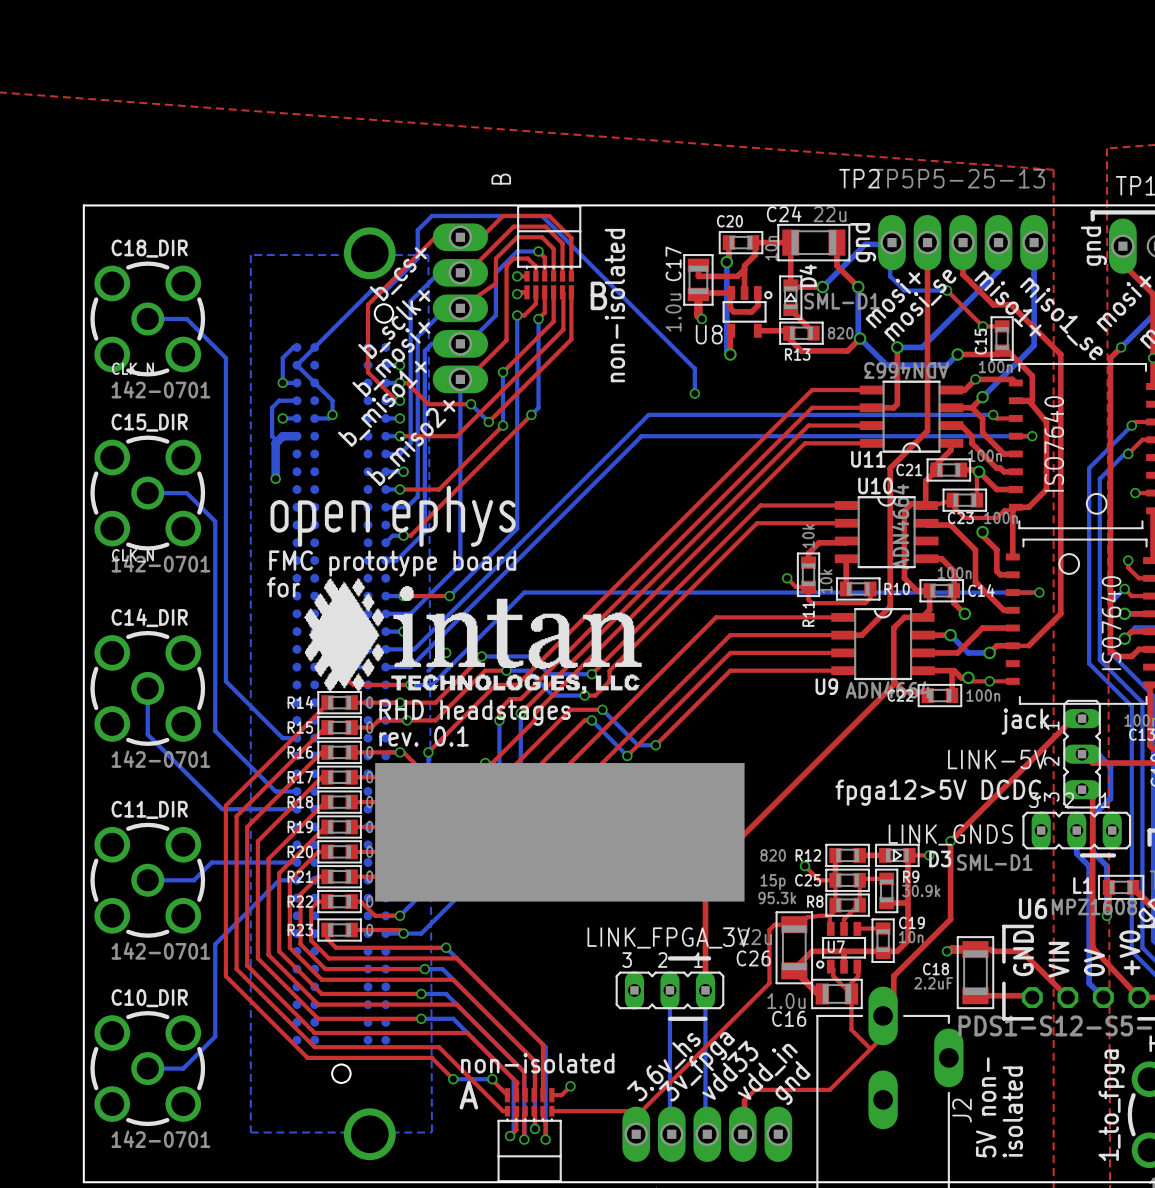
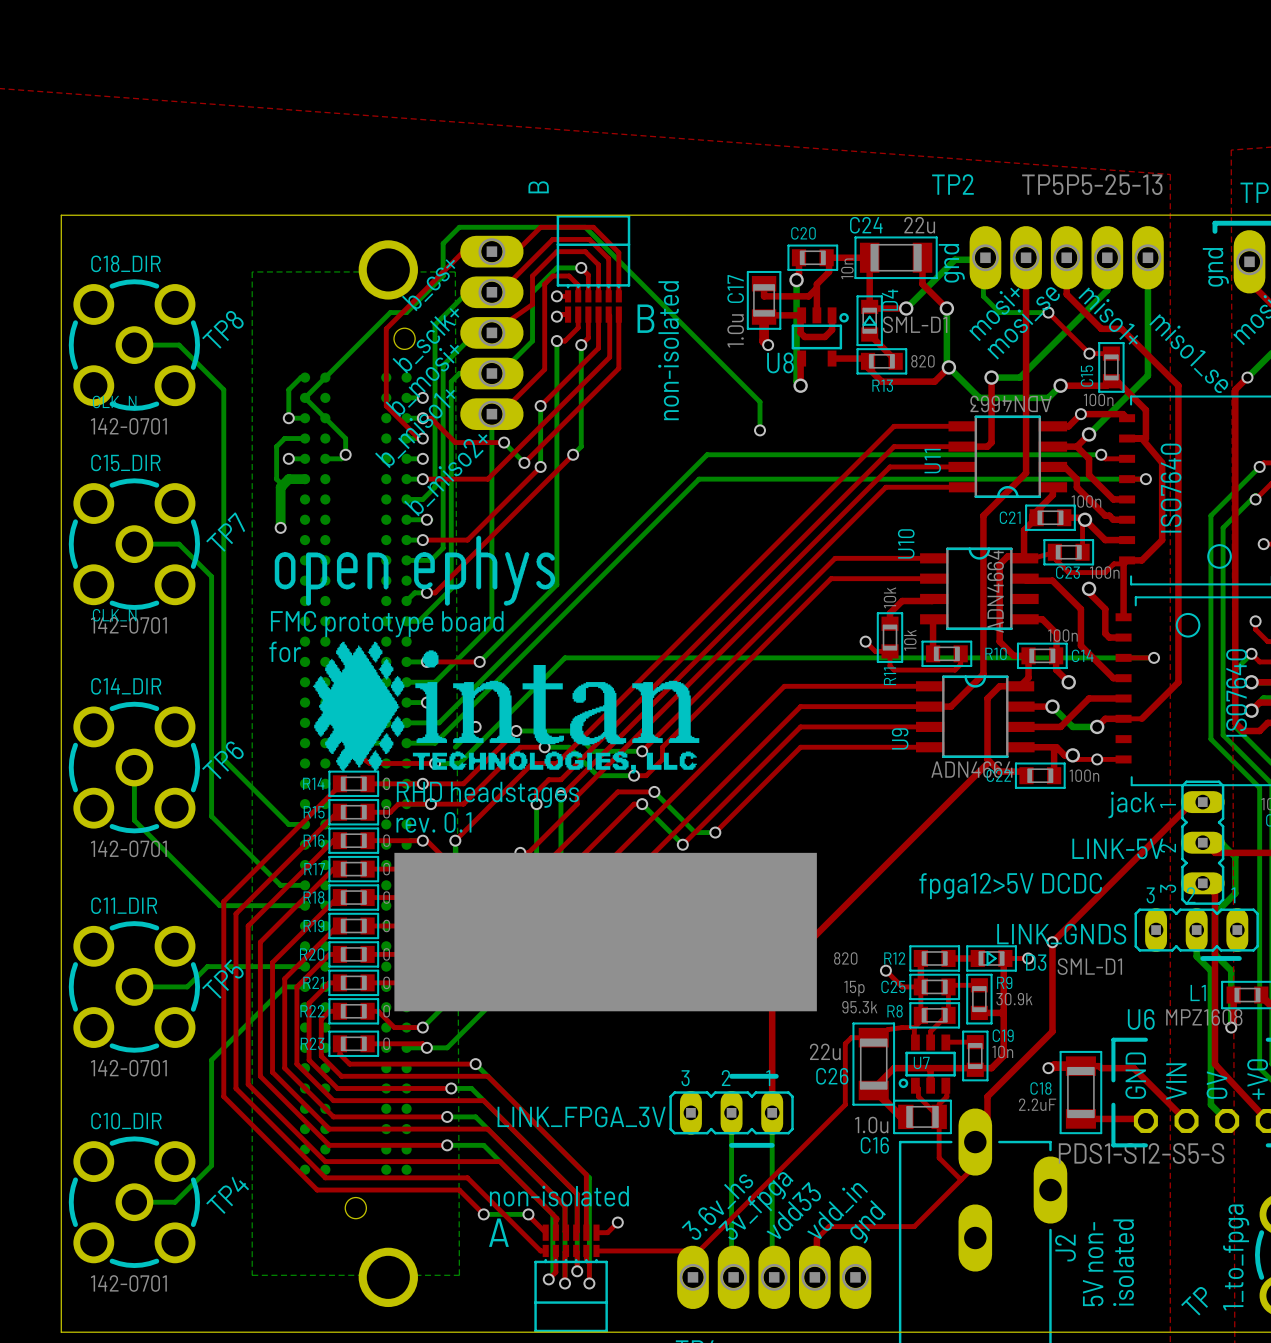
text: none -> TP8 (222, 329)
U11 name rotation: 0° (868, 459) -> 90° counterclockwise (932, 461)
U11 name position: U11 (868, 459) -> U11 (932, 461)
text: none -> TP7 (225, 531)
U10 name rotation: 0° (875, 485) -> 90° counterclockwise (906, 543)
U10 name position: U10 (875, 485) -> U10 (906, 543)
text: none -> TP6 (222, 760)
U9 name rotation: 0° (826, 686) -> 90° counterclockwise (900, 738)
text: none -> TP5 (222, 978)
LINK_FPGA_3V name position: LINK_FPGA_3V (668, 937) -> LINK_FPGA_3V (581, 1116)
text: none -> TP4 (227, 1195)
text: none -> TP (1194, 1301)

